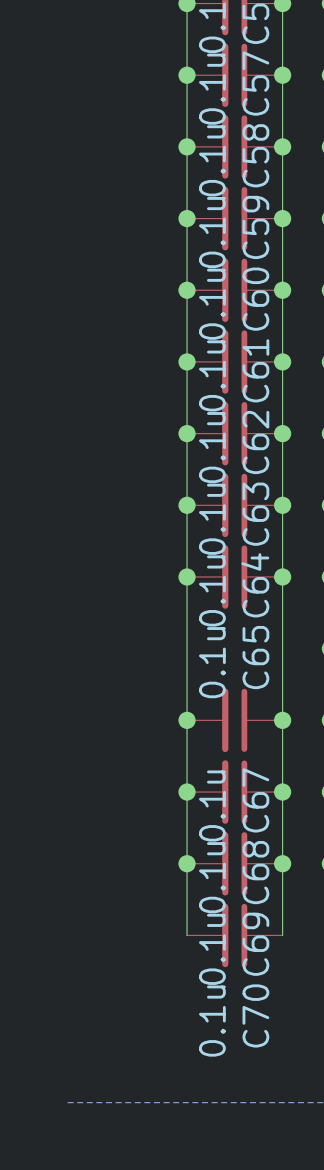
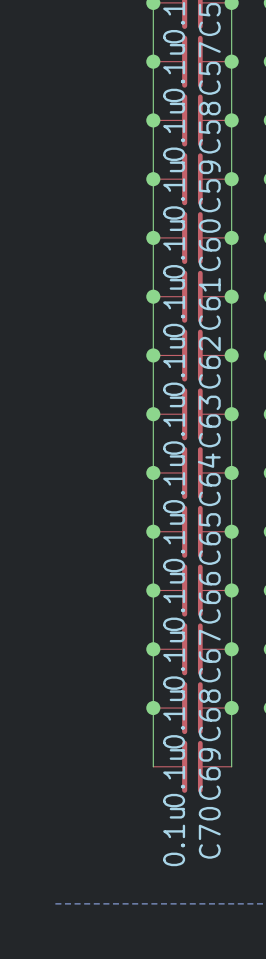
junction: none -> (153, 531)
C66: none -> 0.1u (192, 531)
junction: none -> (231, 531)

